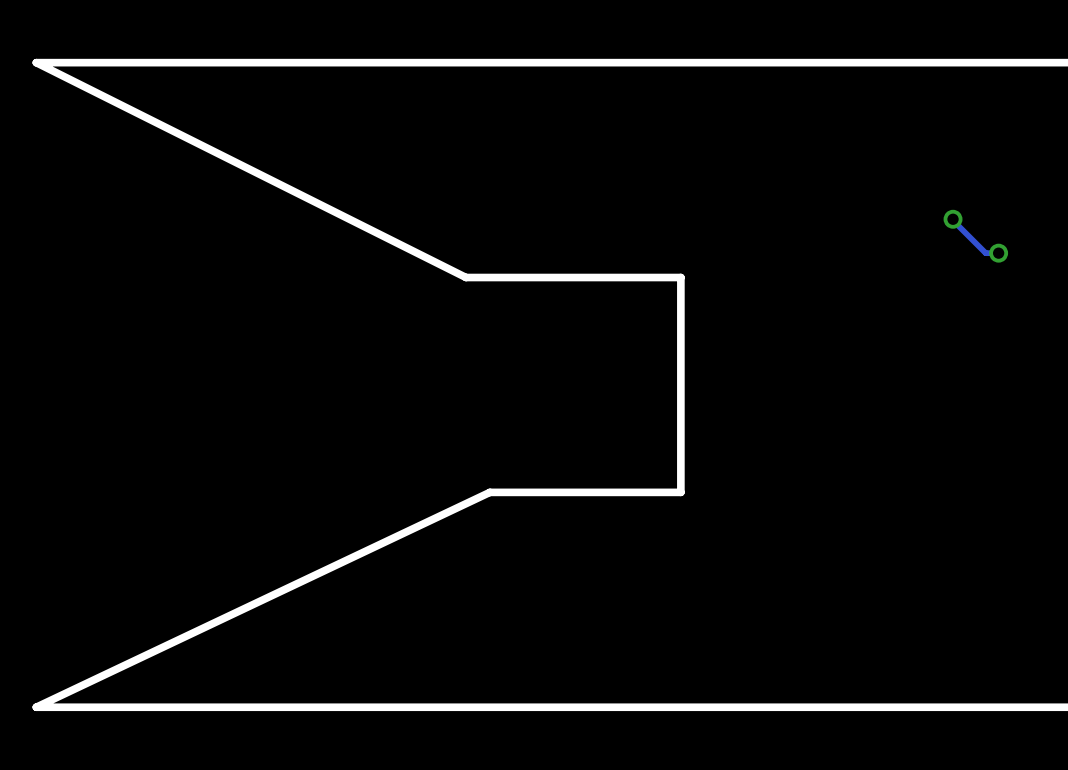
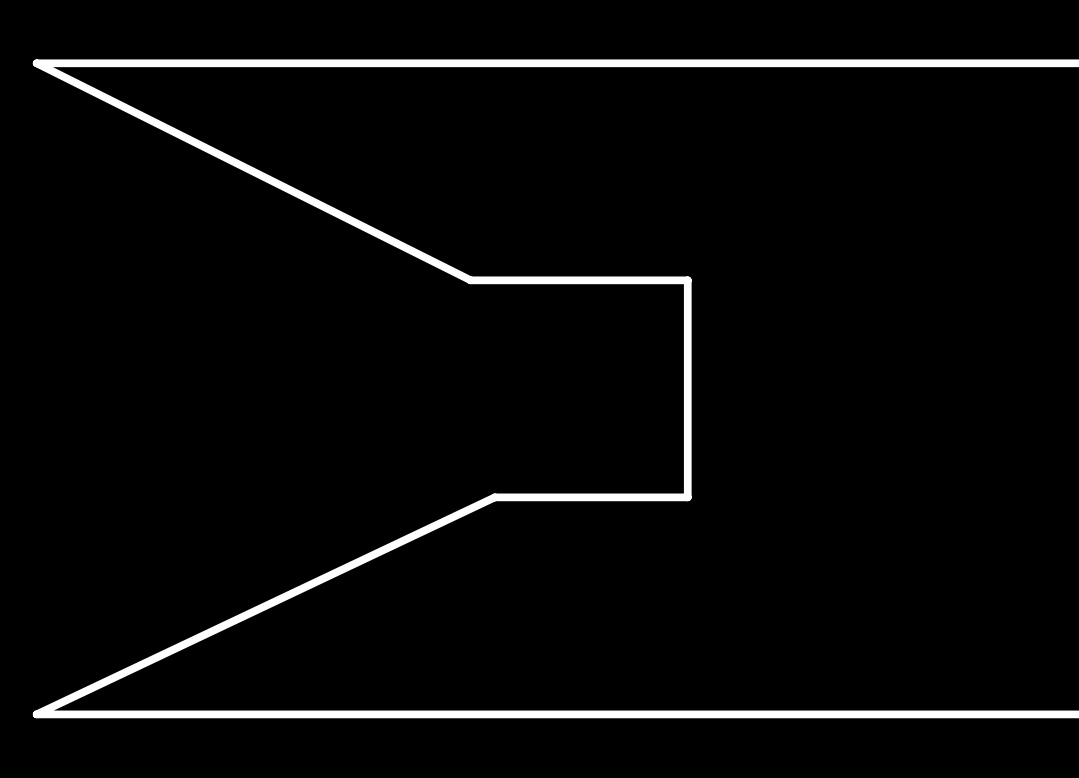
track: (953, 219) (985, 253) (998, 253) -> none
via: (953, 219) -> none
via: (998, 253) -> none

